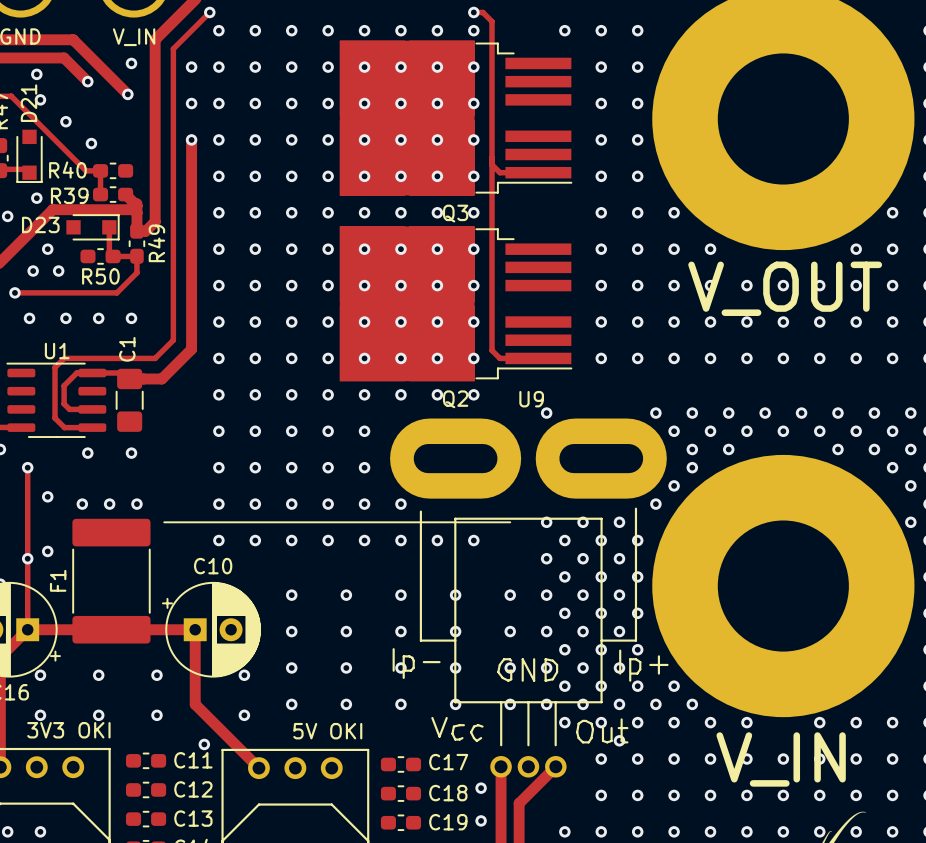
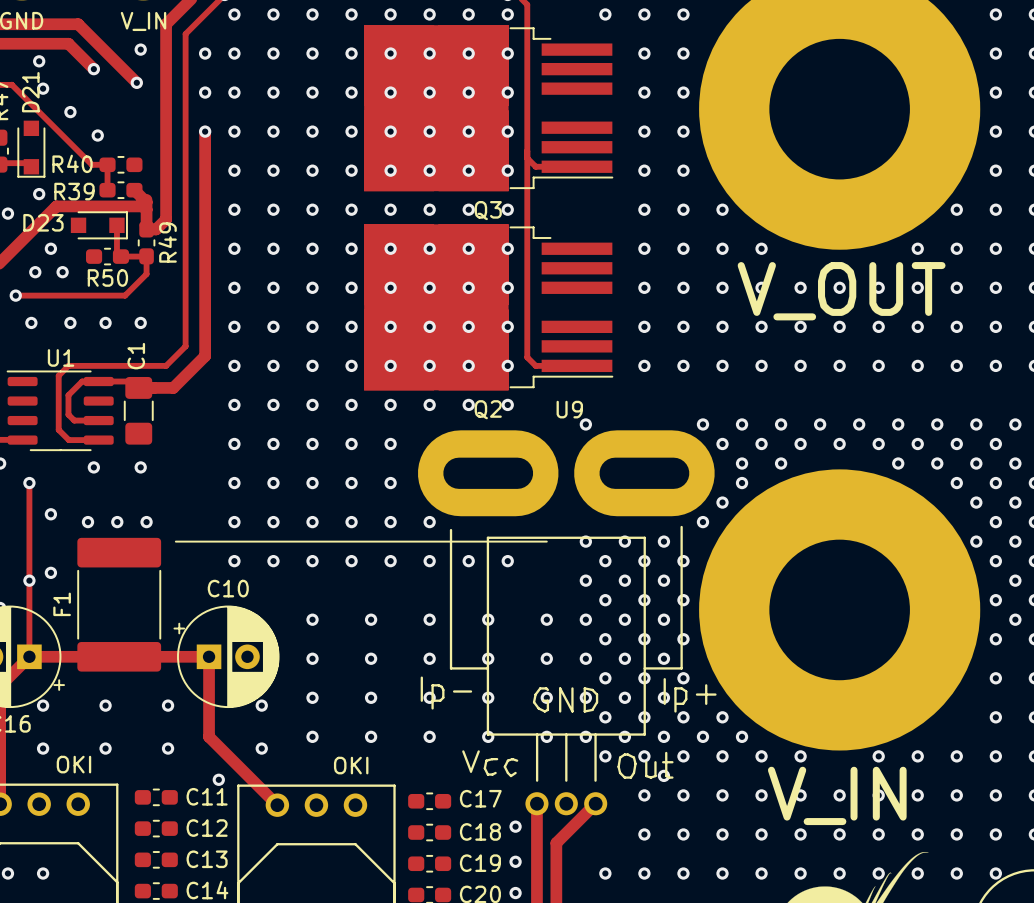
part value: 3V3 OKI (68, 730) -> OKI (73, 764)
part value: 5V OKI (327, 731) -> OKI (351, 765)

